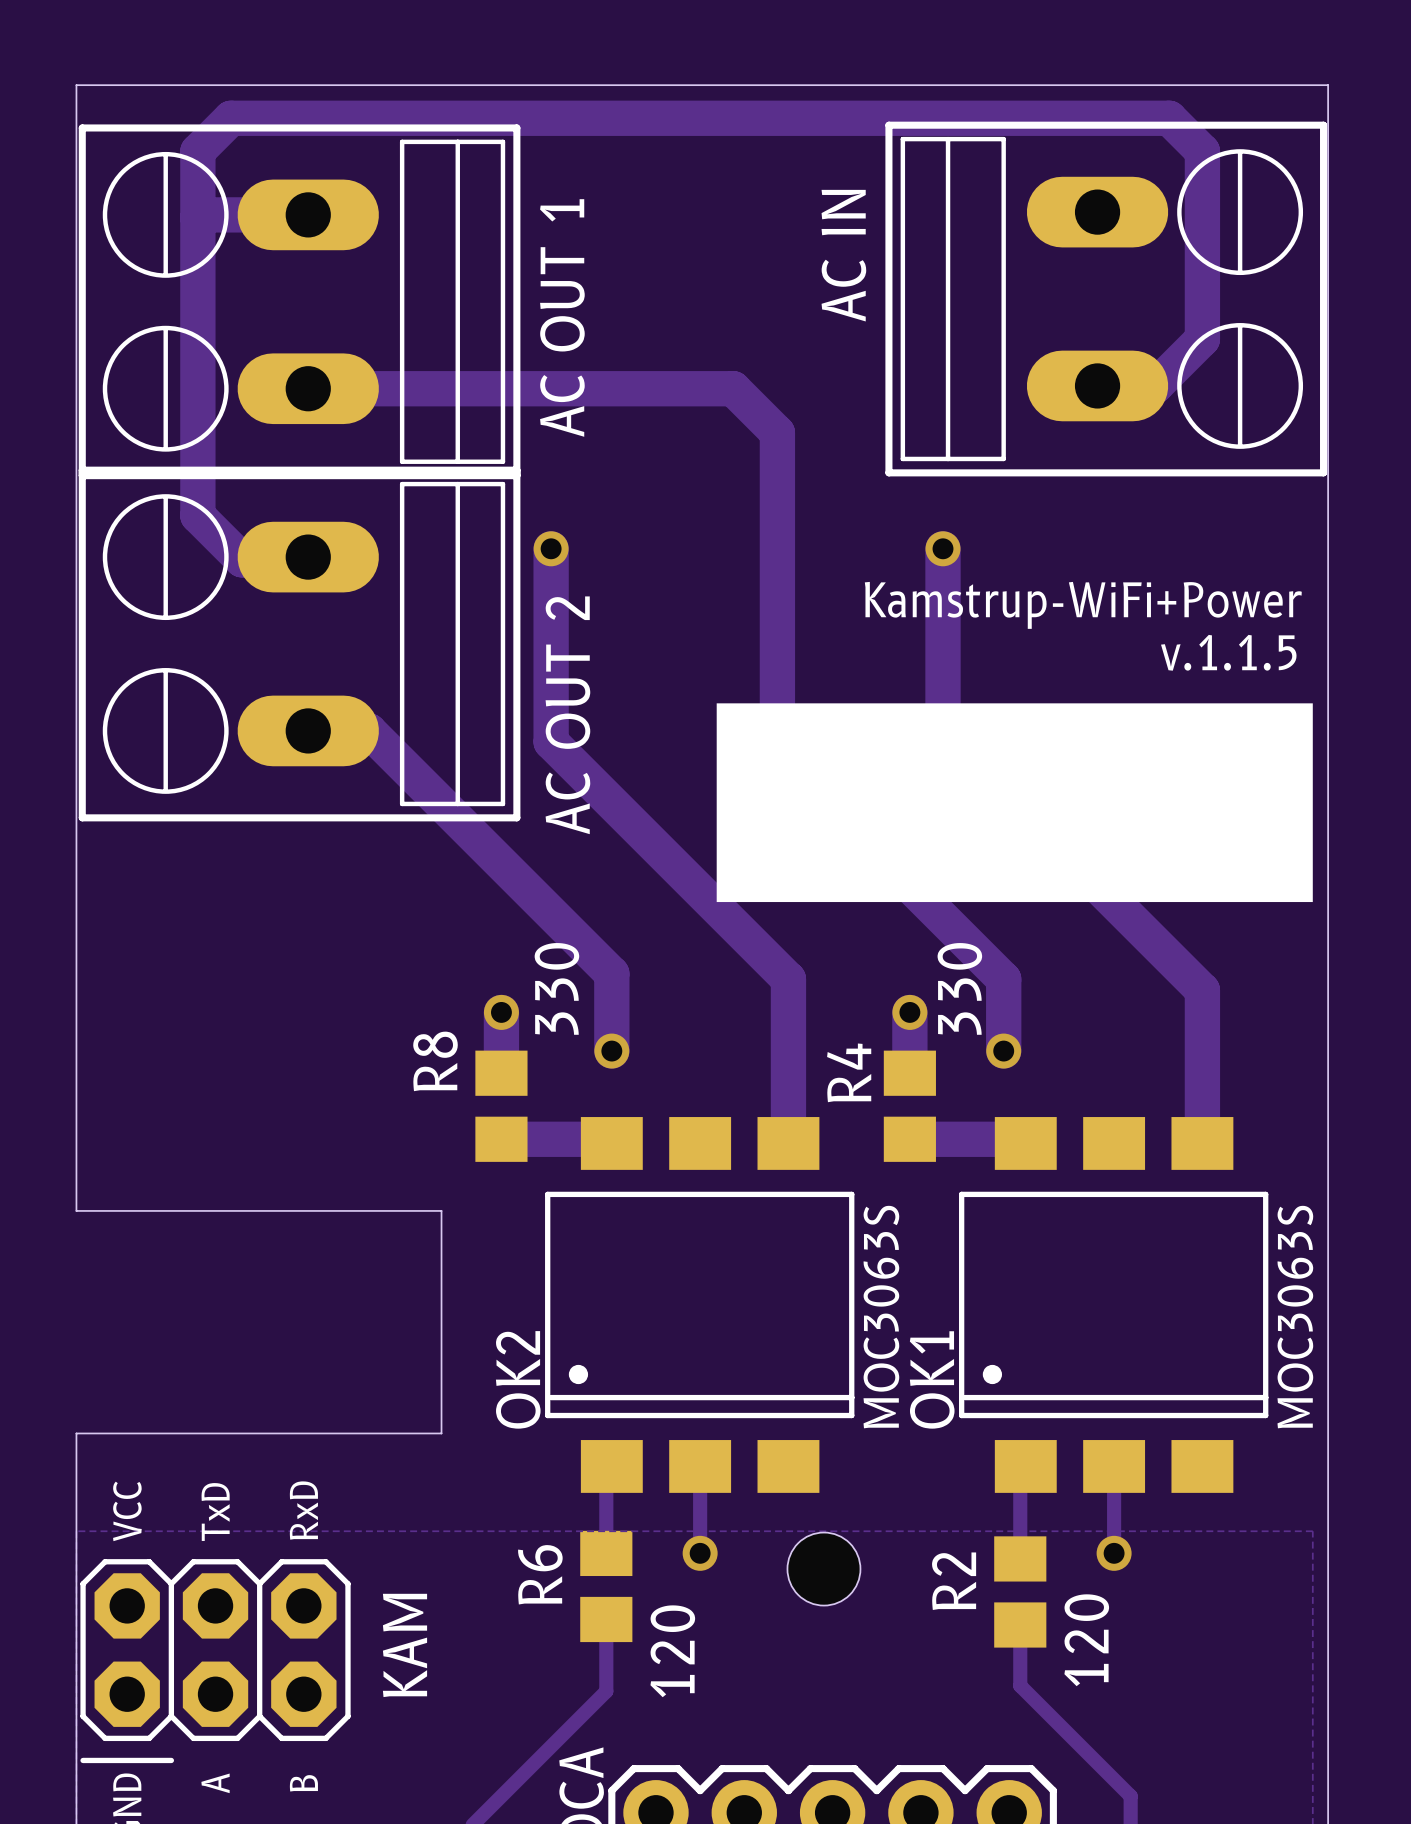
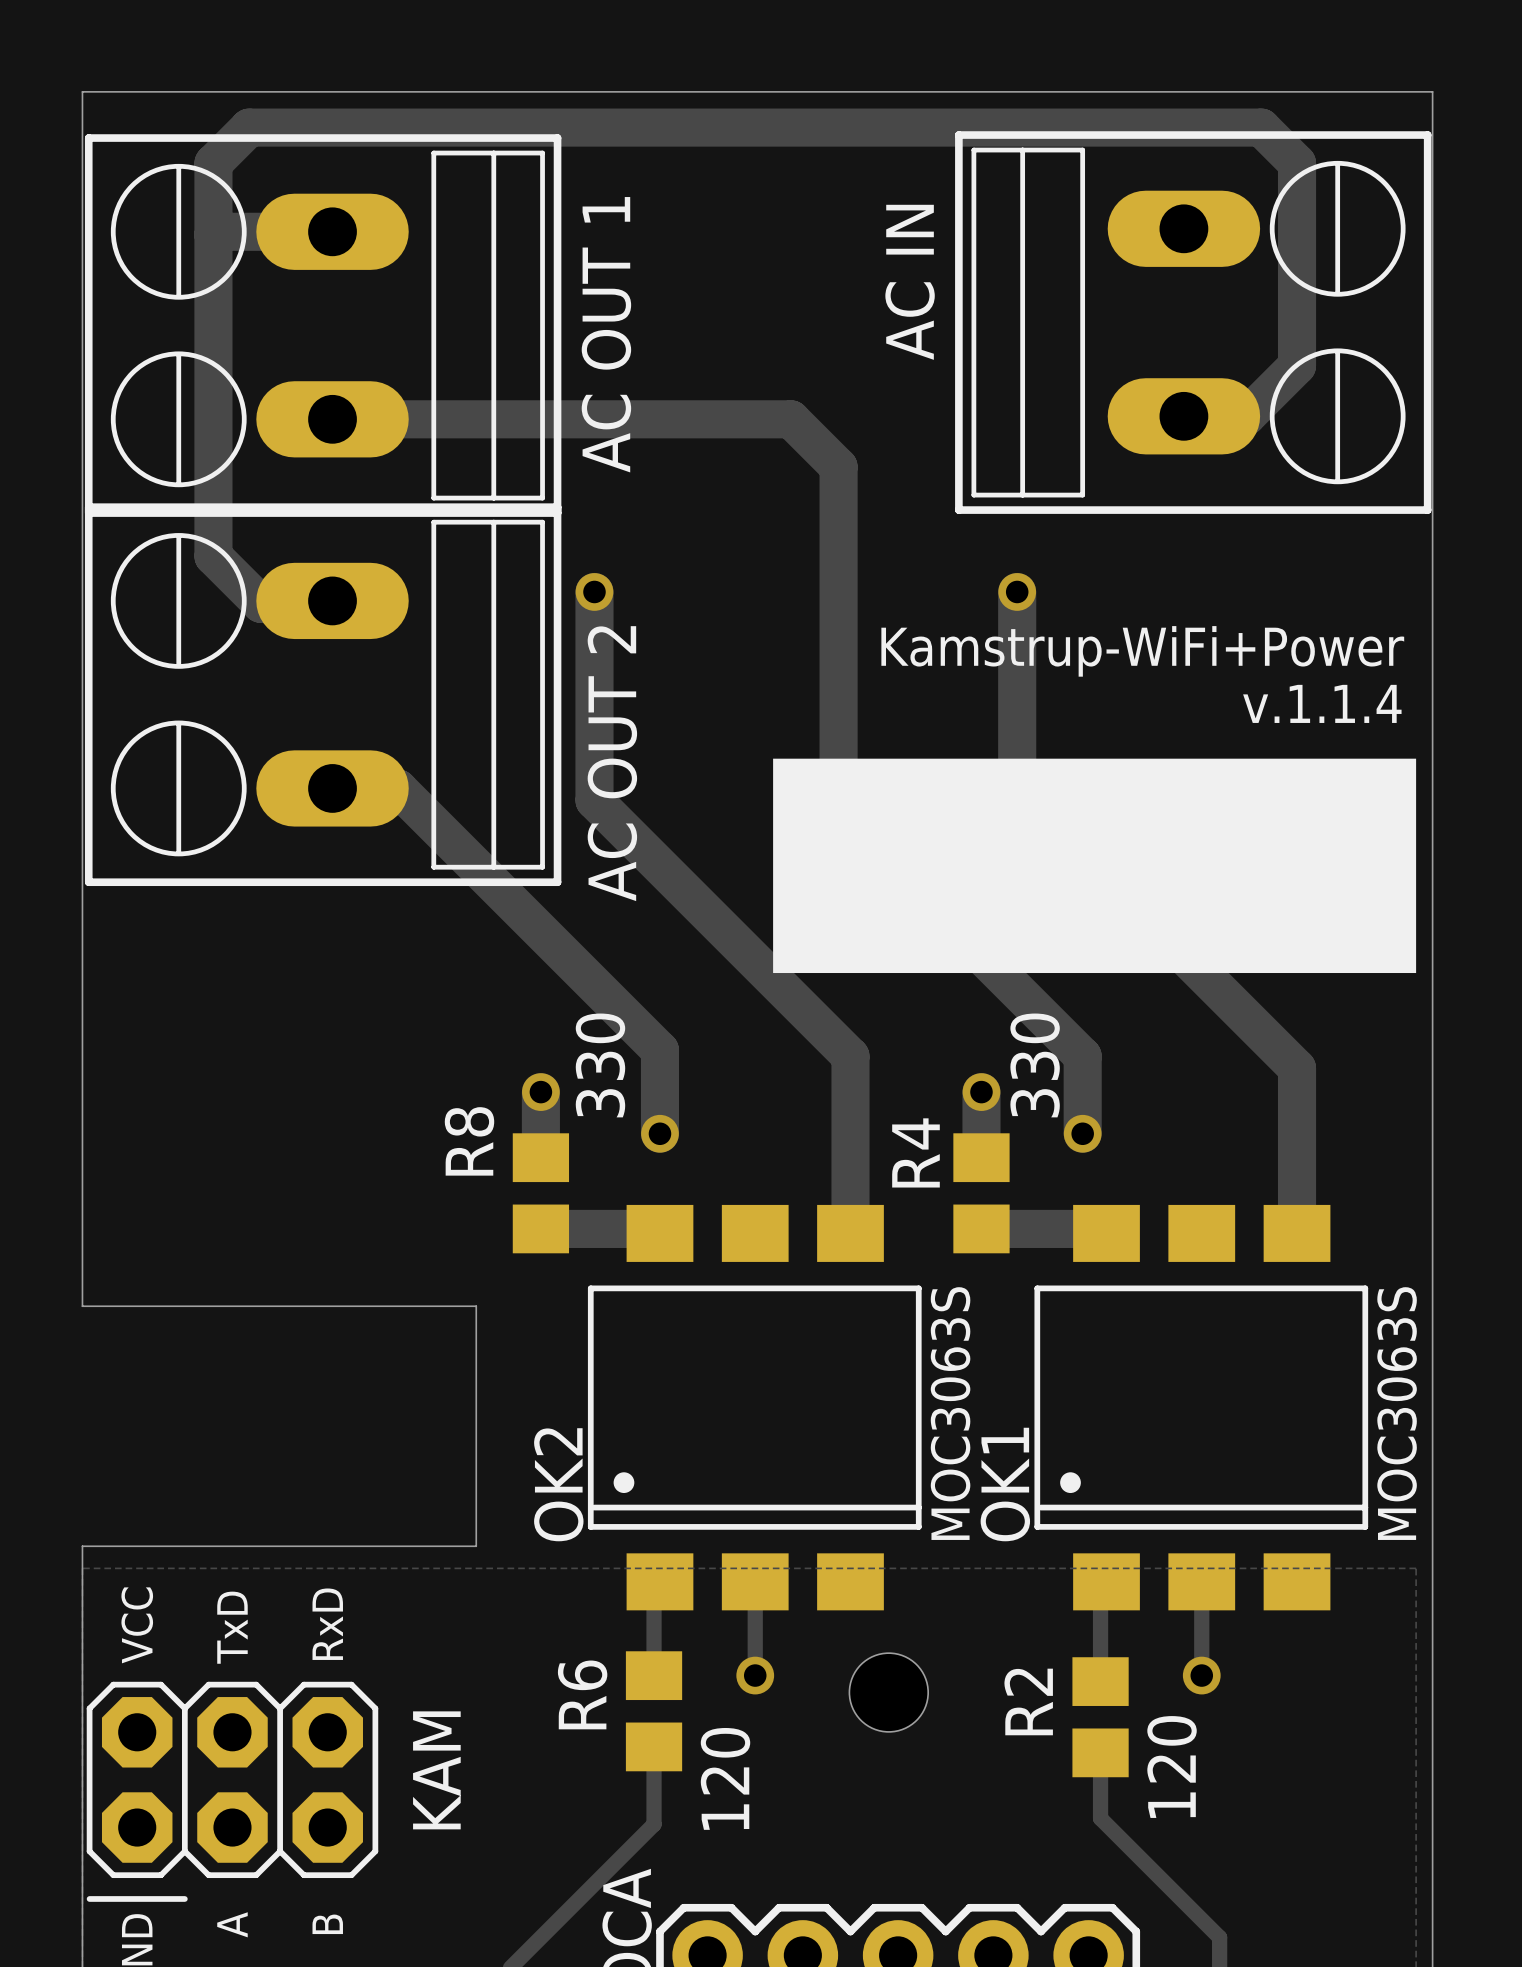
text: v.1.1.5 (1228, 652) -> v.1.1.4 (1322, 703)
zone outline: (76, 1531) (1312, 1531) -> (82, 1651) (82, 1568) (1416, 1568) (1416, 1651)

